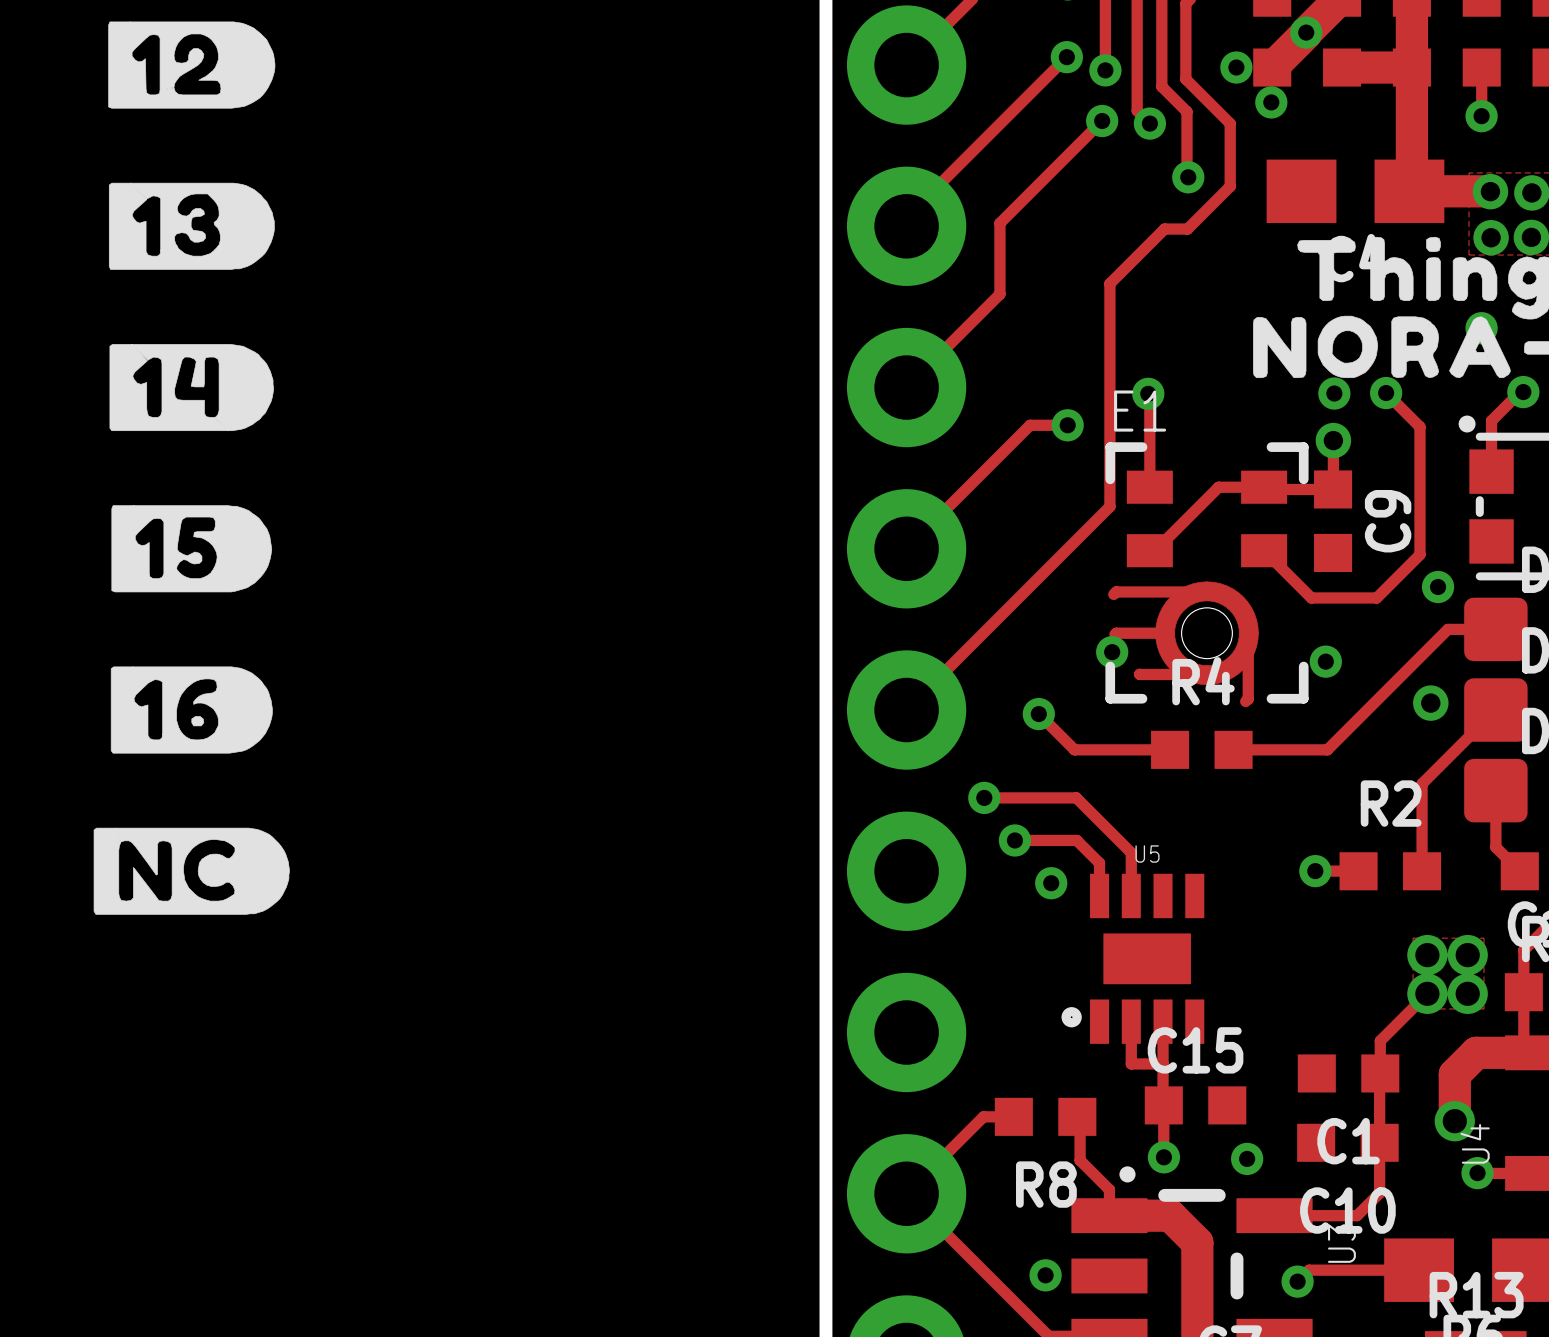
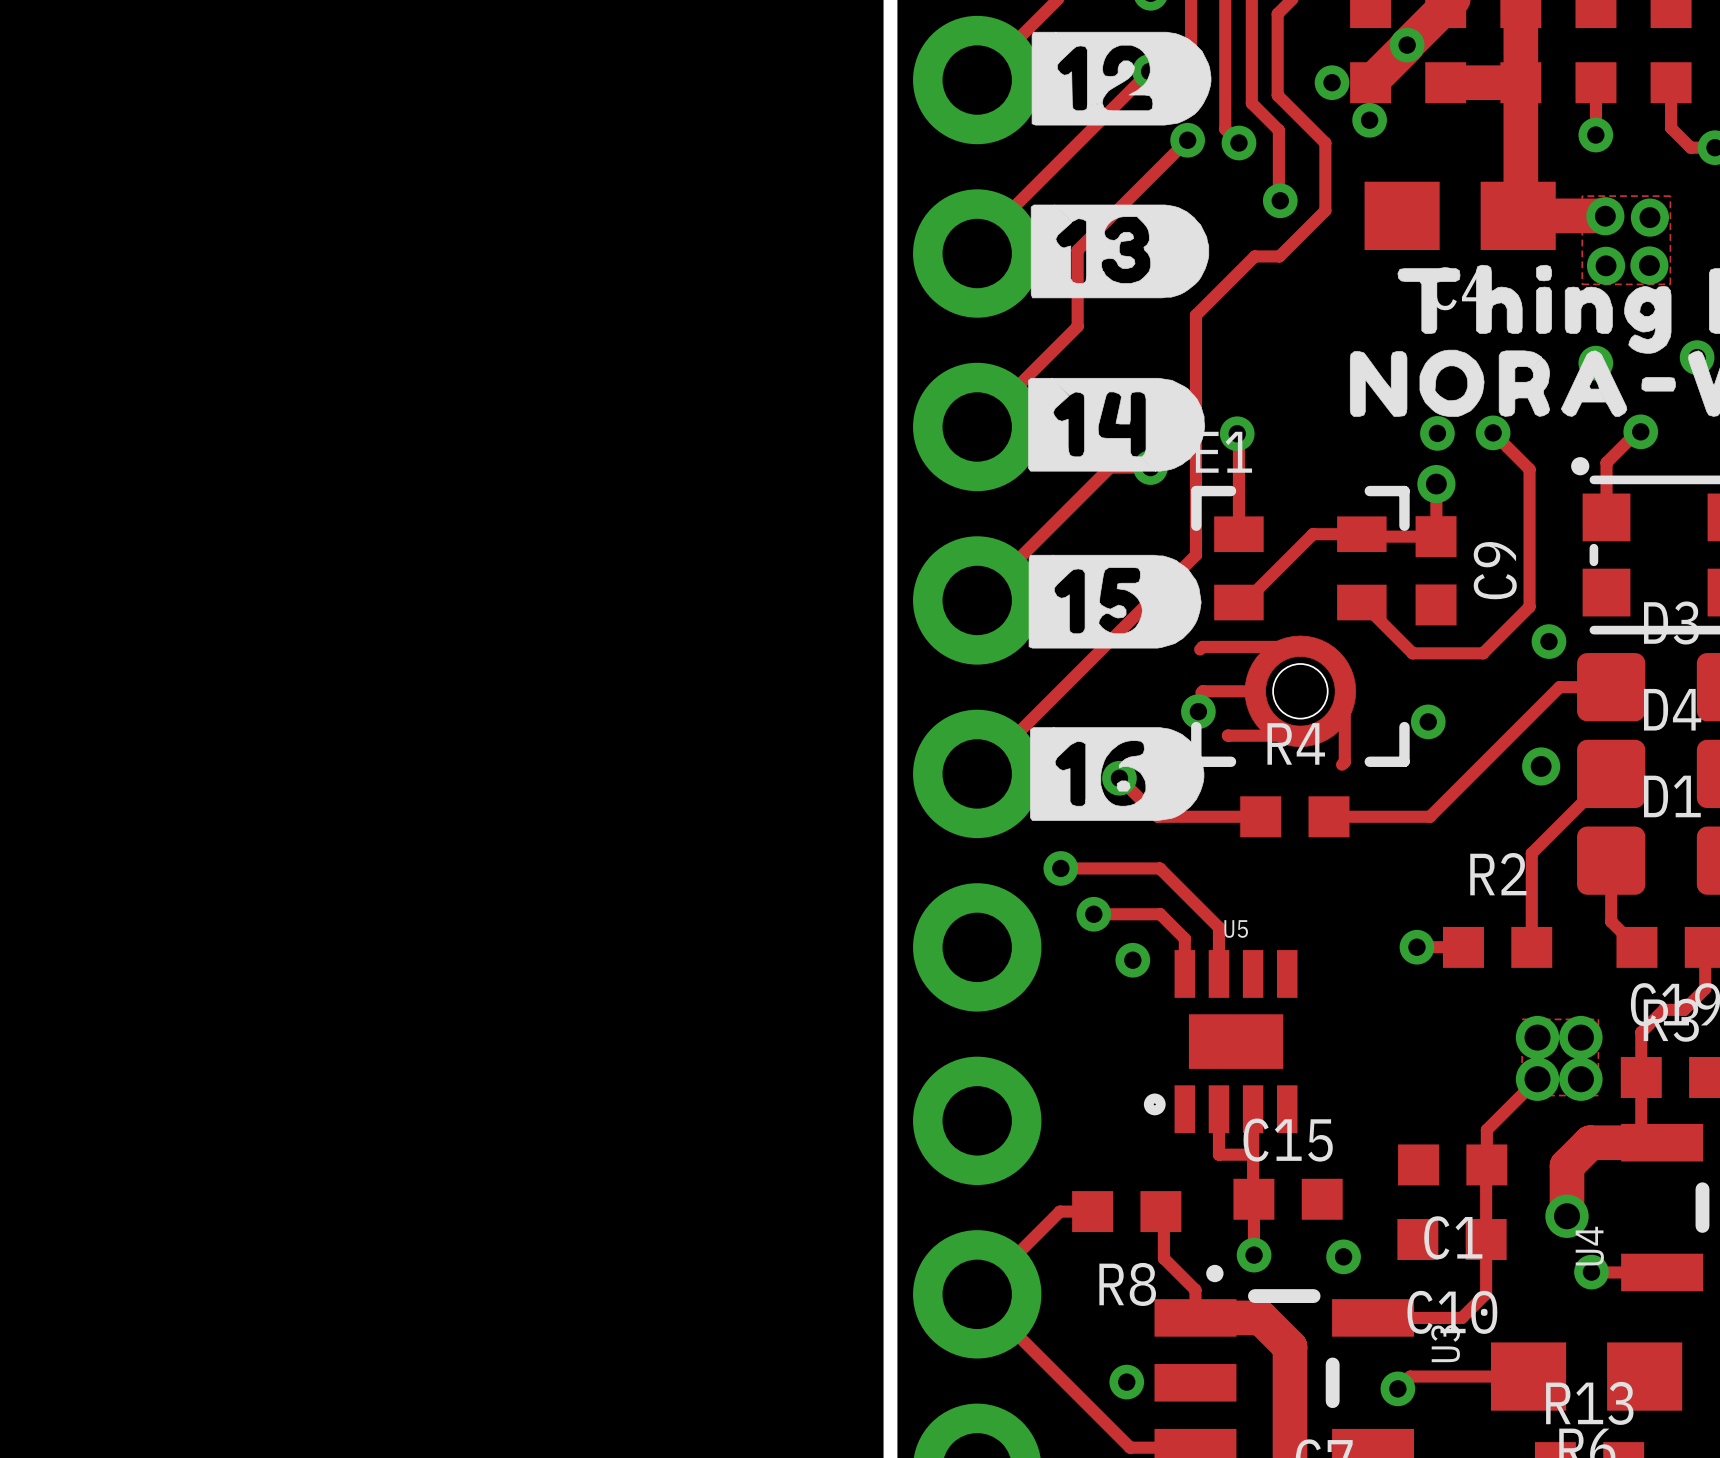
drawing position: (191, 65) -> (1121, 78)
drawing position: (191, 226) -> (1119, 251)
drawing position: (191, 387) -> (1116, 424)
drawing position: (191, 548) -> (1115, 601)
drawing position: (191, 710) -> (1117, 774)
drawing: [93, 827, 290, 915] -> none

